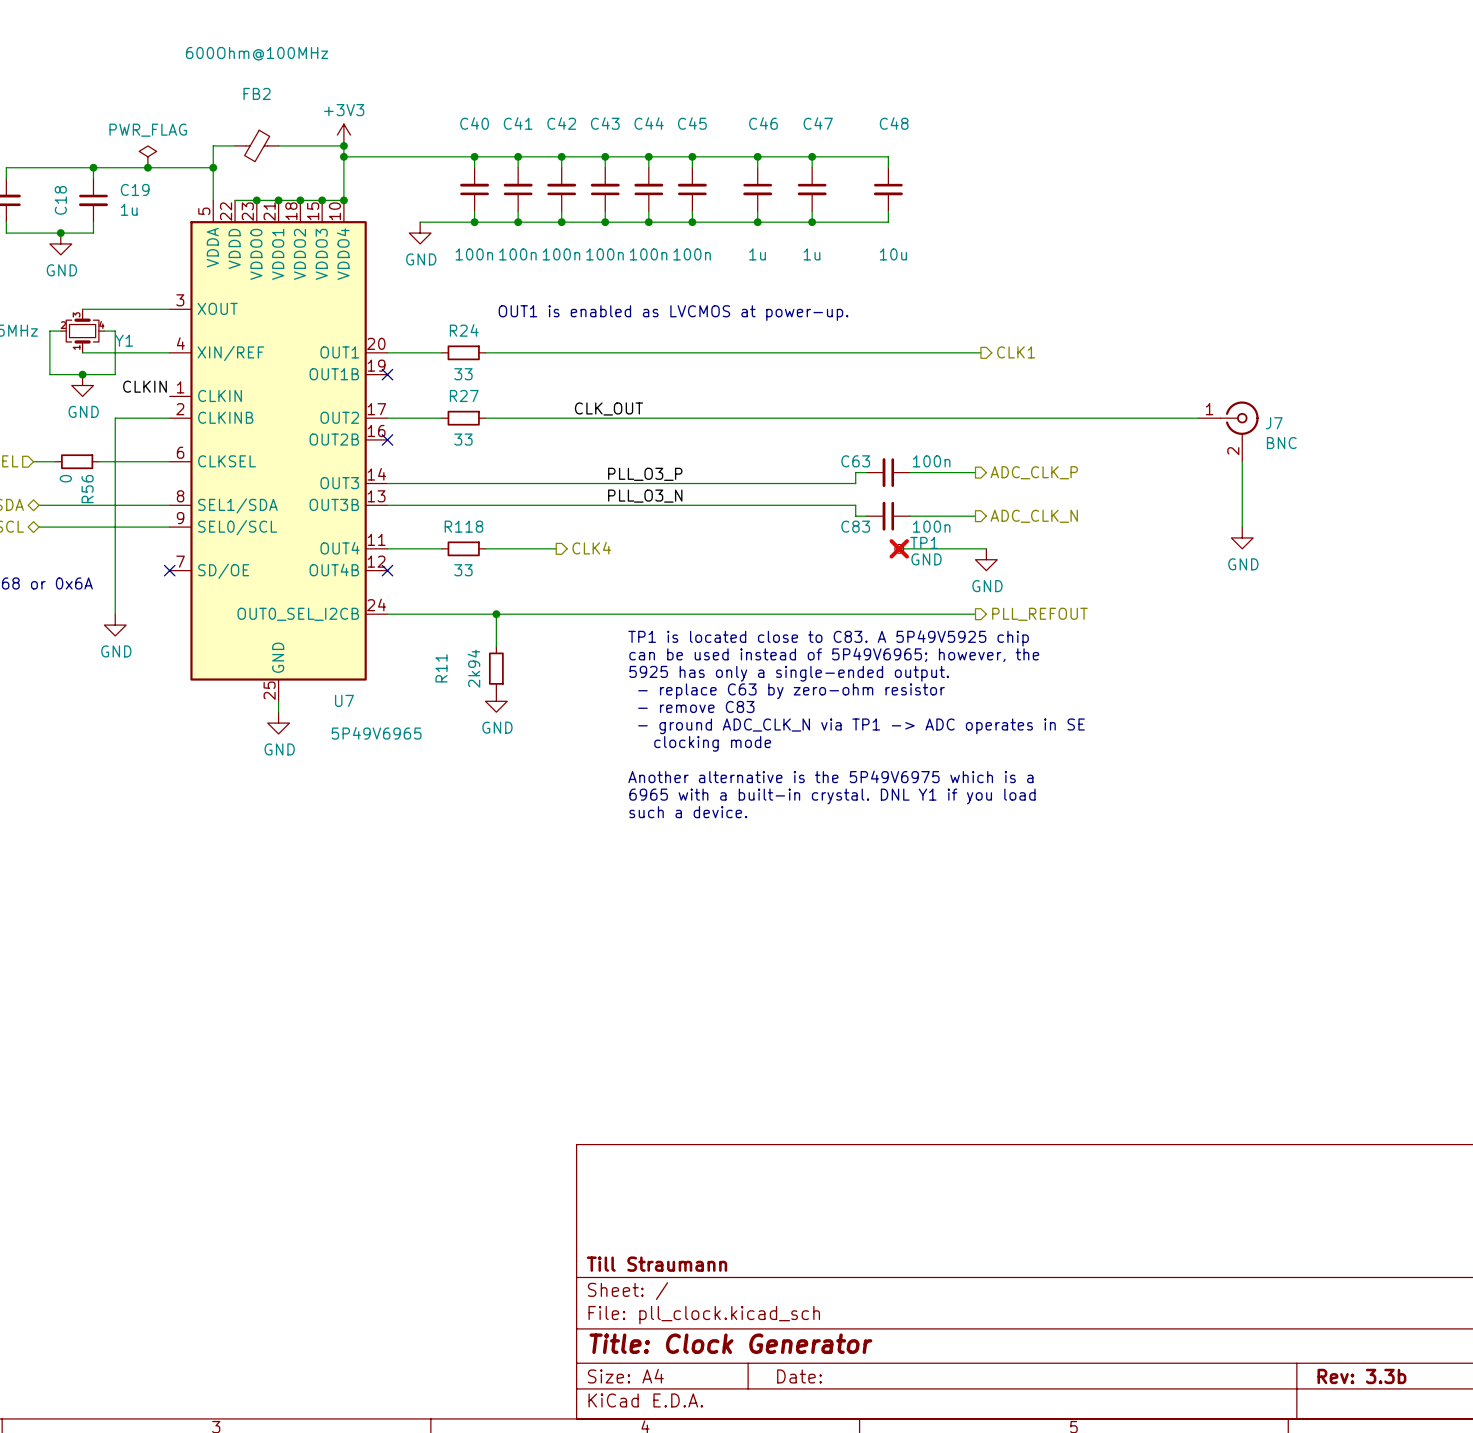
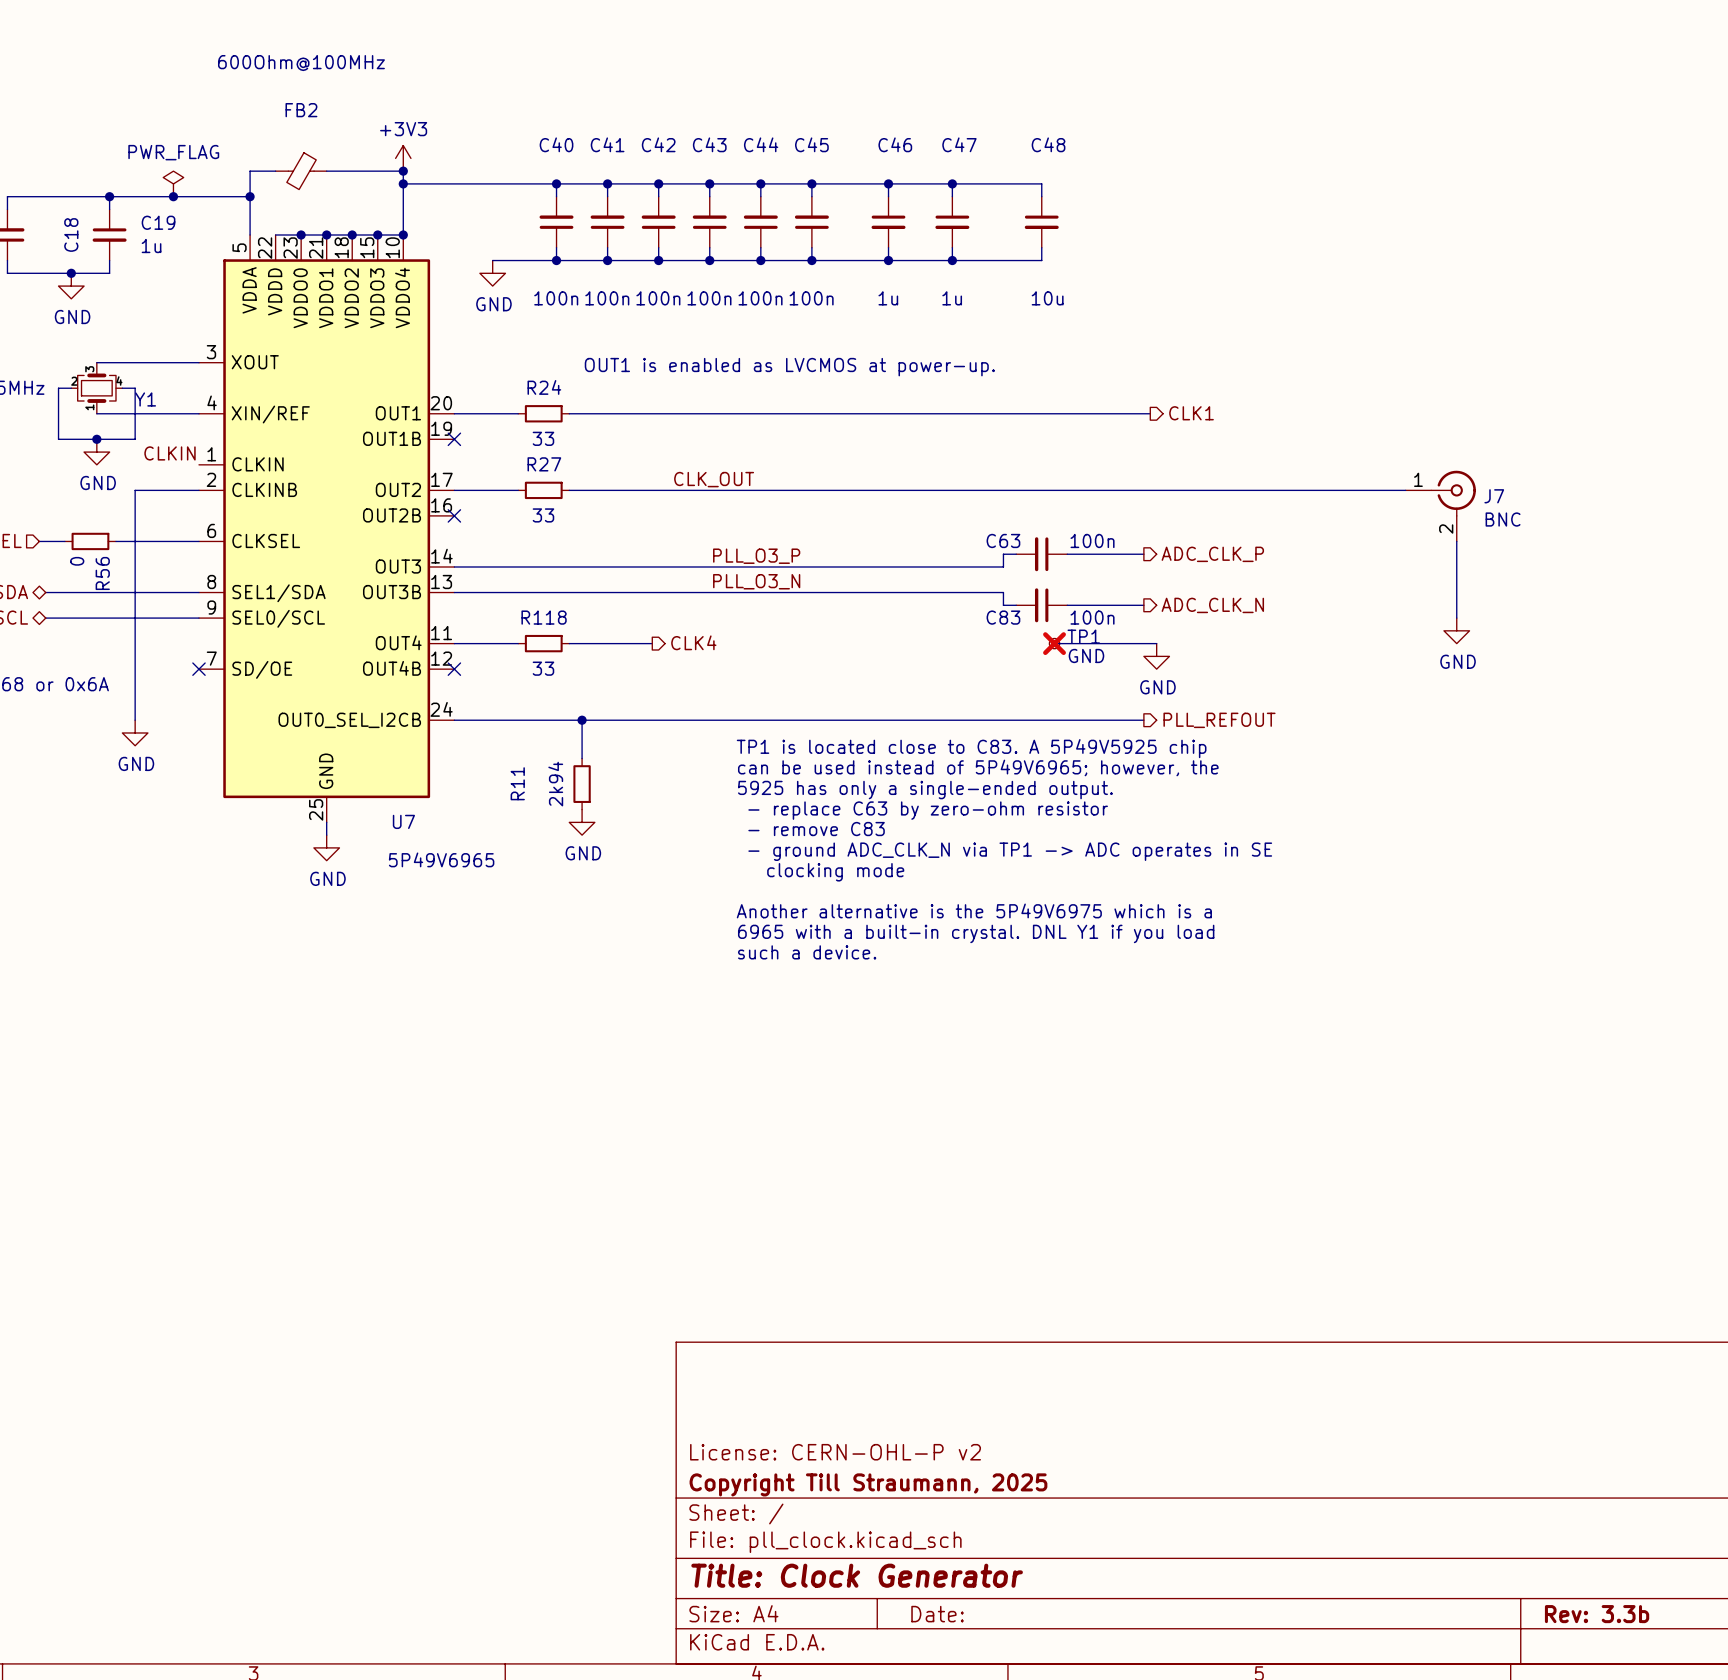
title block: none -> License: CERN-OHL-P v2 (835, 1452)
title block: Till Straumann (657, 1264) -> Copyright Till Straumann, 2025 (868, 1484)

